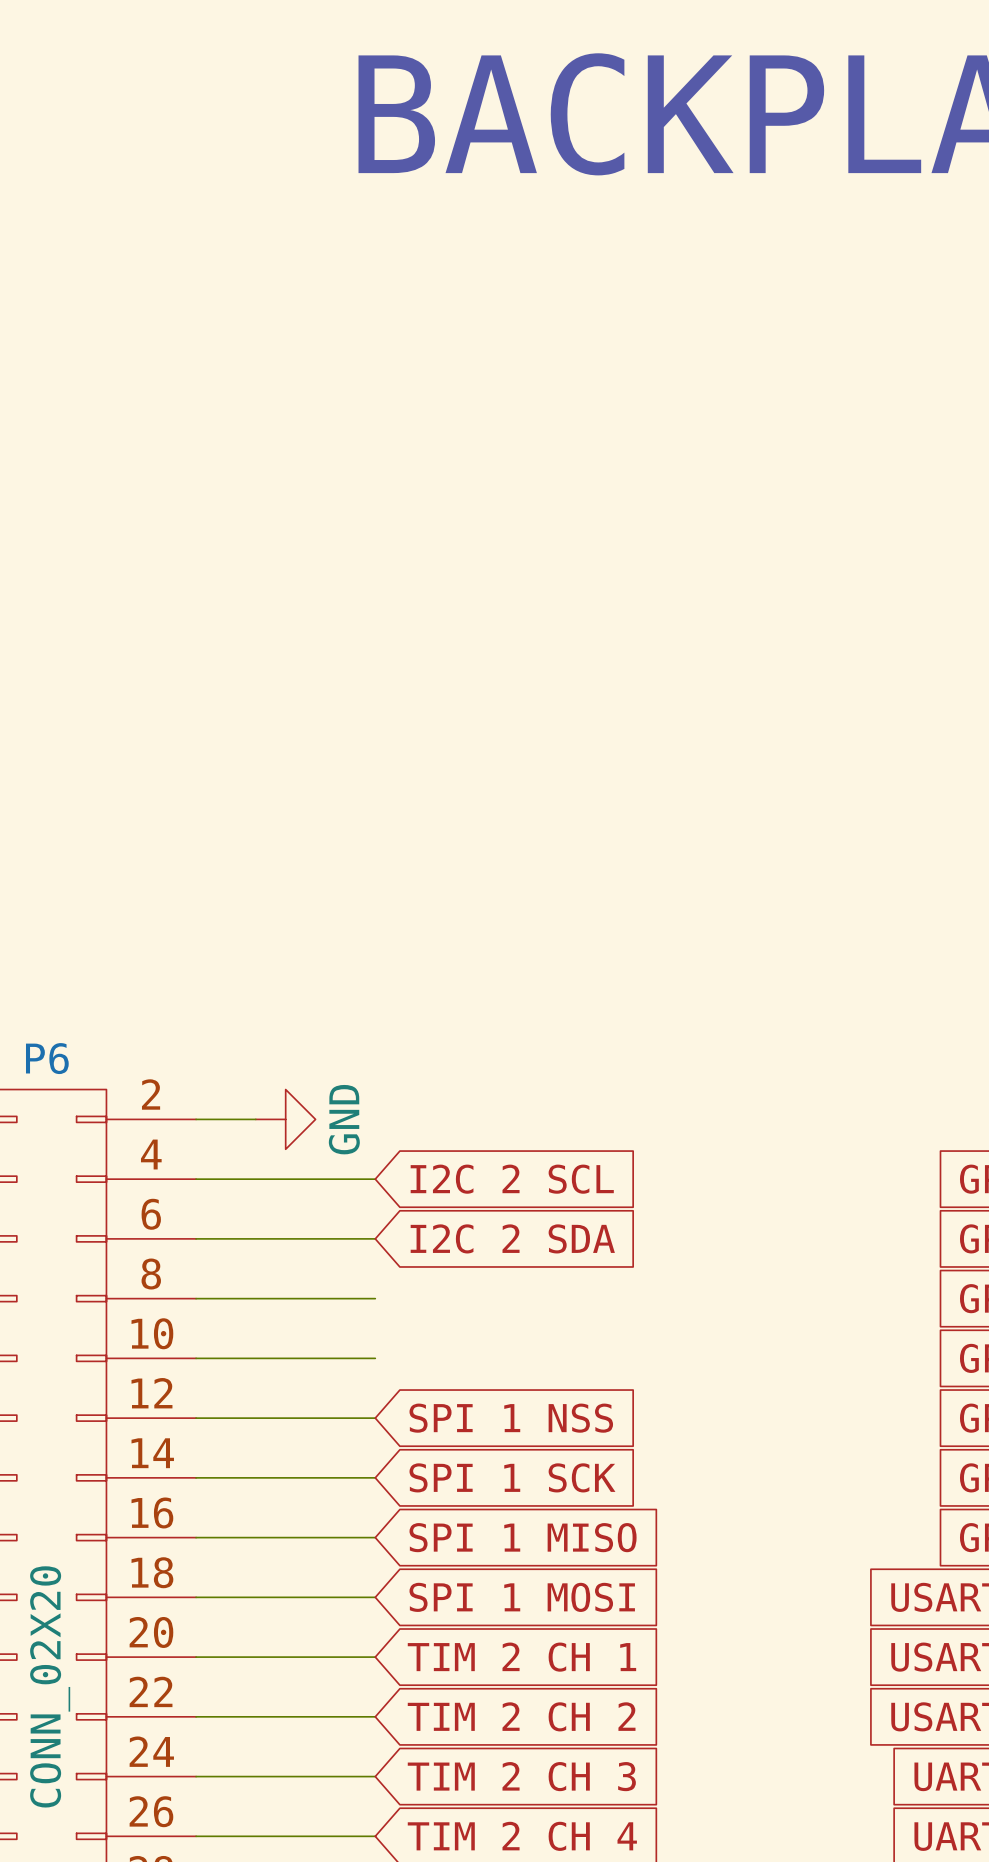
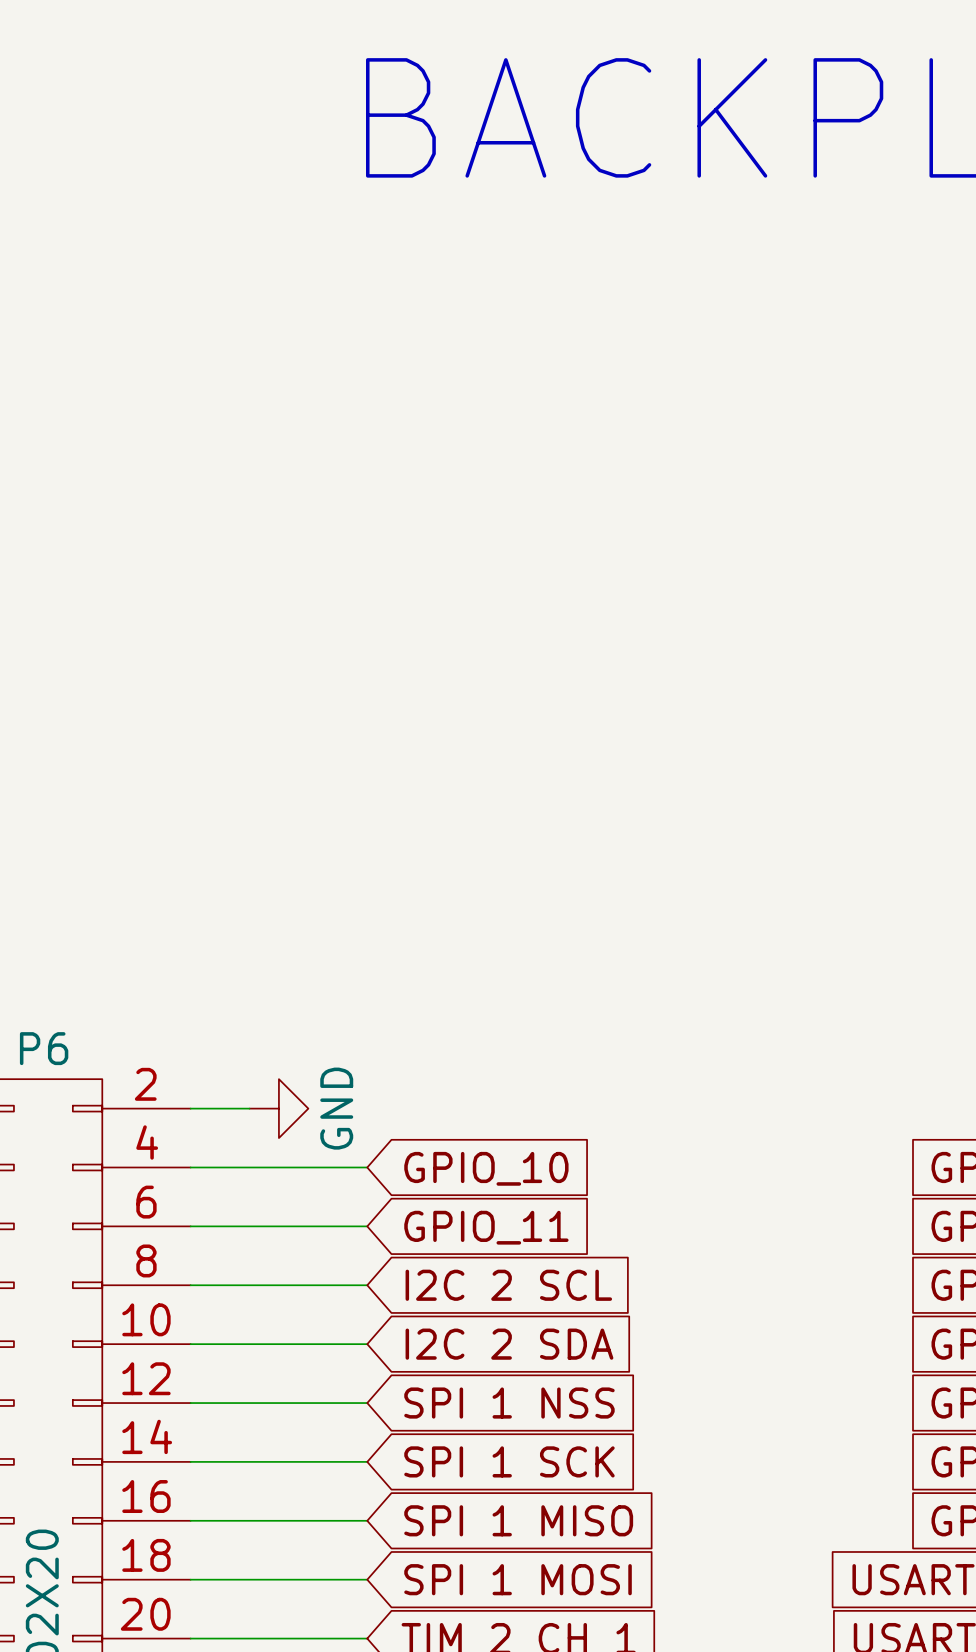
global label: I2C 2 SCL (512, 1179) -> GPIO_10 (486, 1168)
global label: I2C 2 SDA (512, 1238) -> GPIO_11 (486, 1227)
global label: none -> I2C 2 SCL (508, 1285)
global label: none -> I2C 2 SDA (509, 1344)

